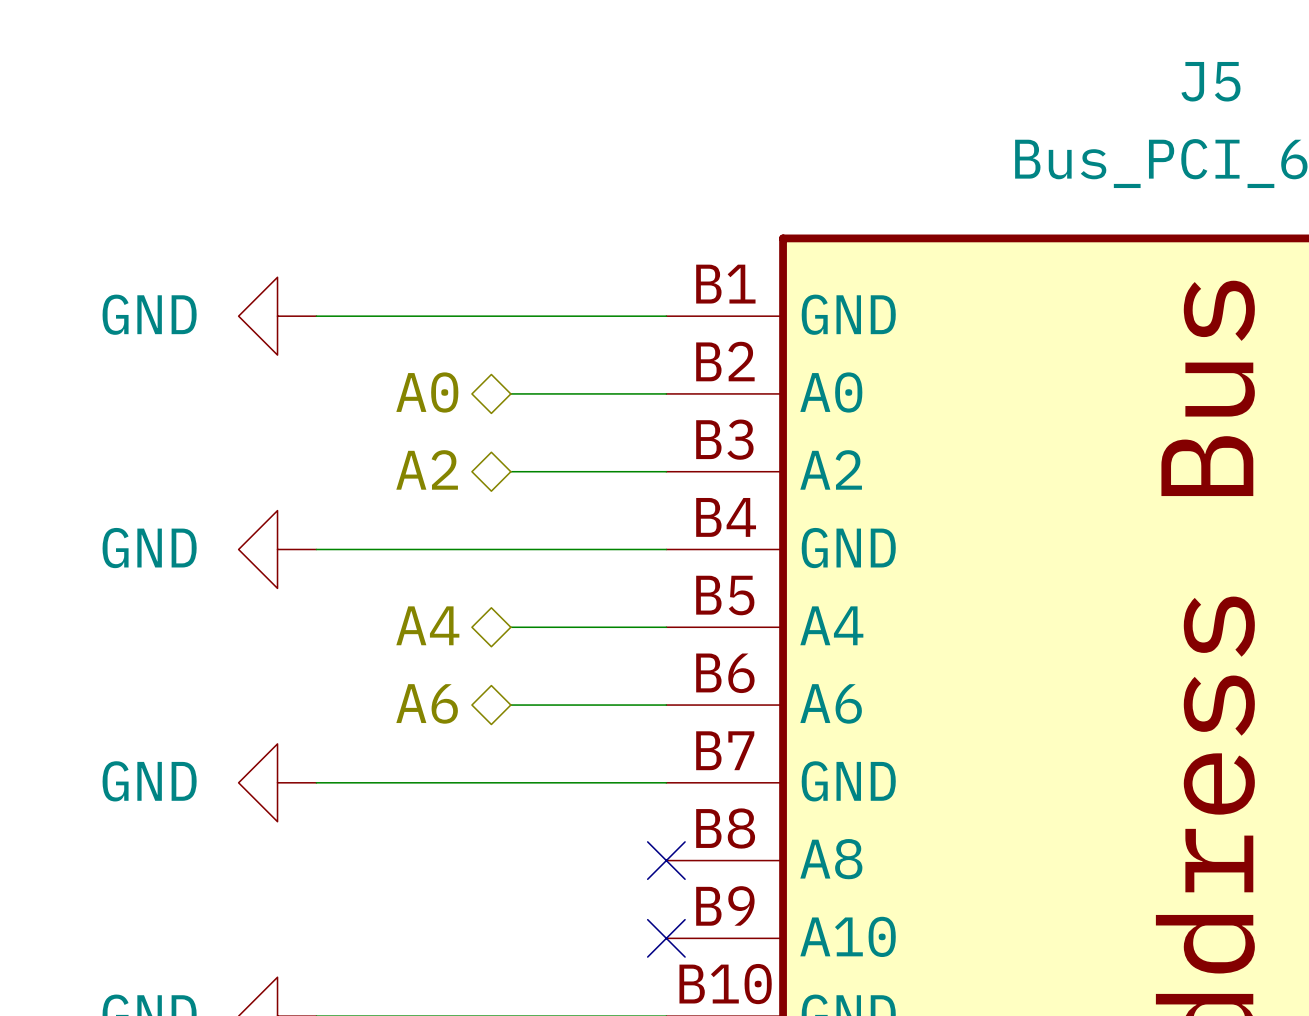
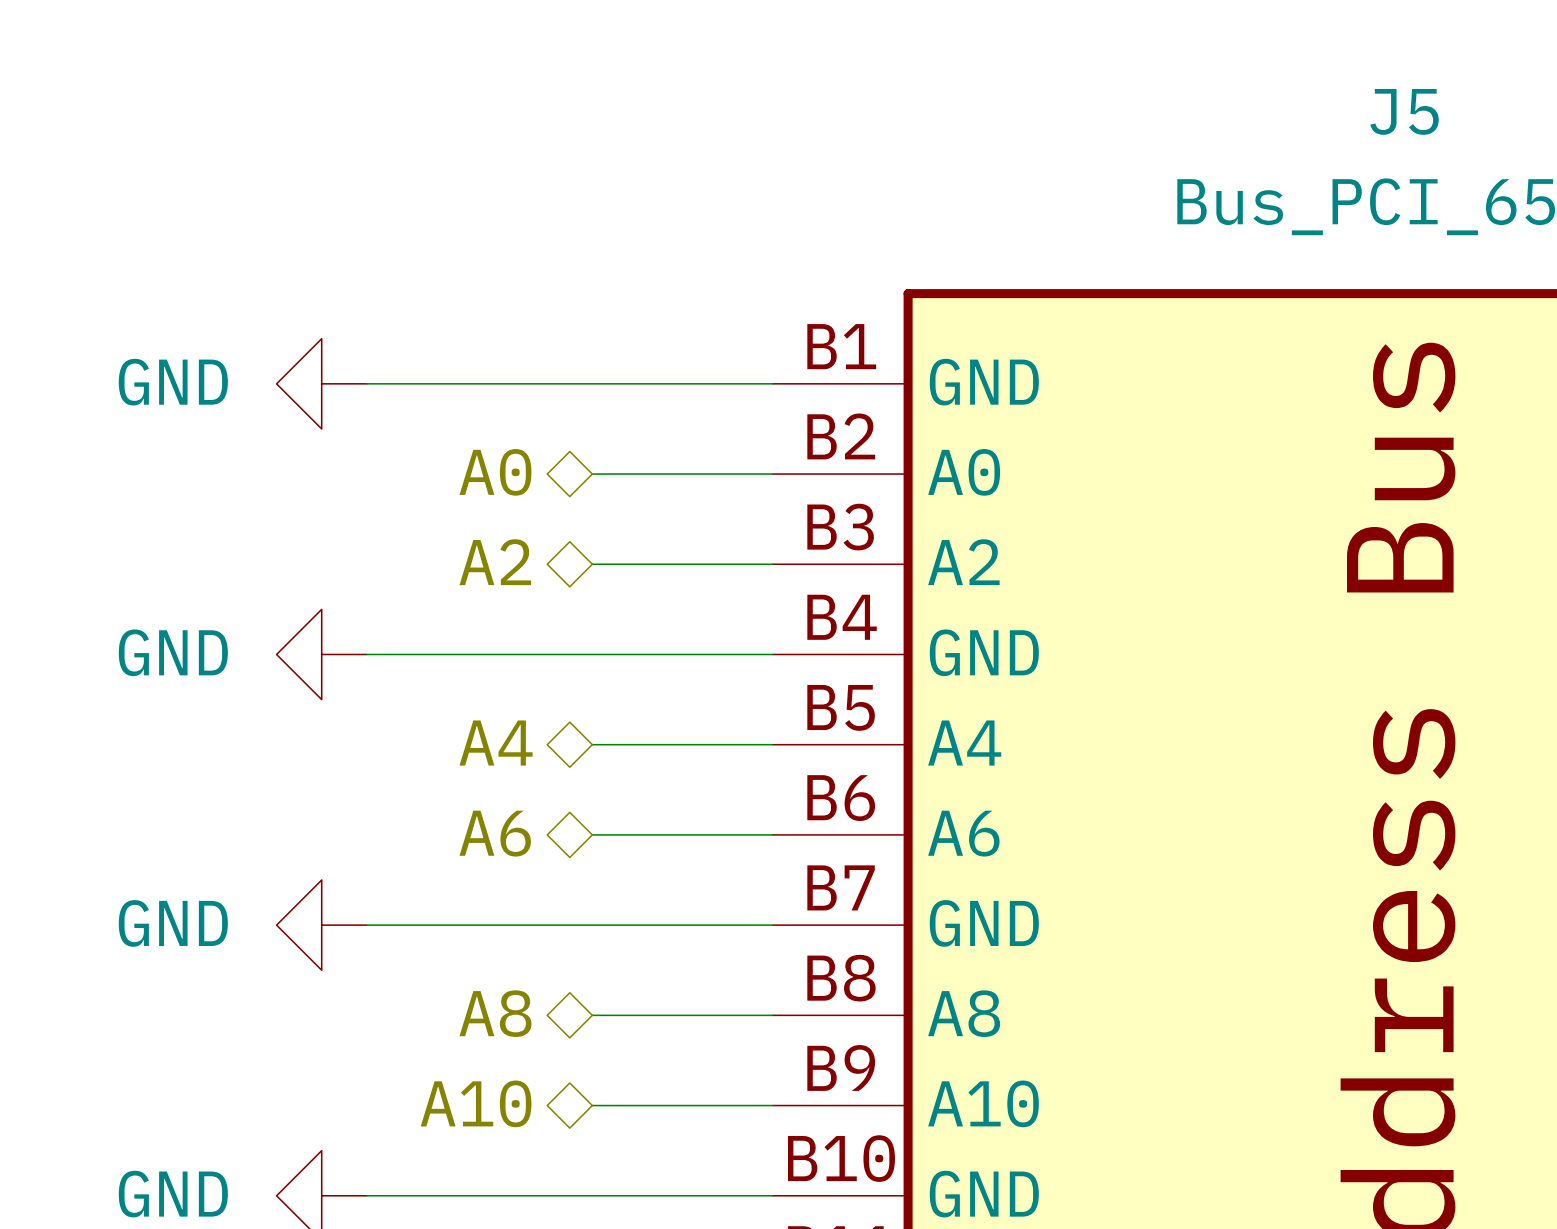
hierarchical label: none -> A8 (495, 1013)
wire: none -> (592, 1015) (772, 1015)
no-connect mark: (666, 860) -> none
hierarchical label: none -> A10 (476, 1103)
wire: none -> (592, 1105) (772, 1105)
no-connect mark: (666, 938) -> none

